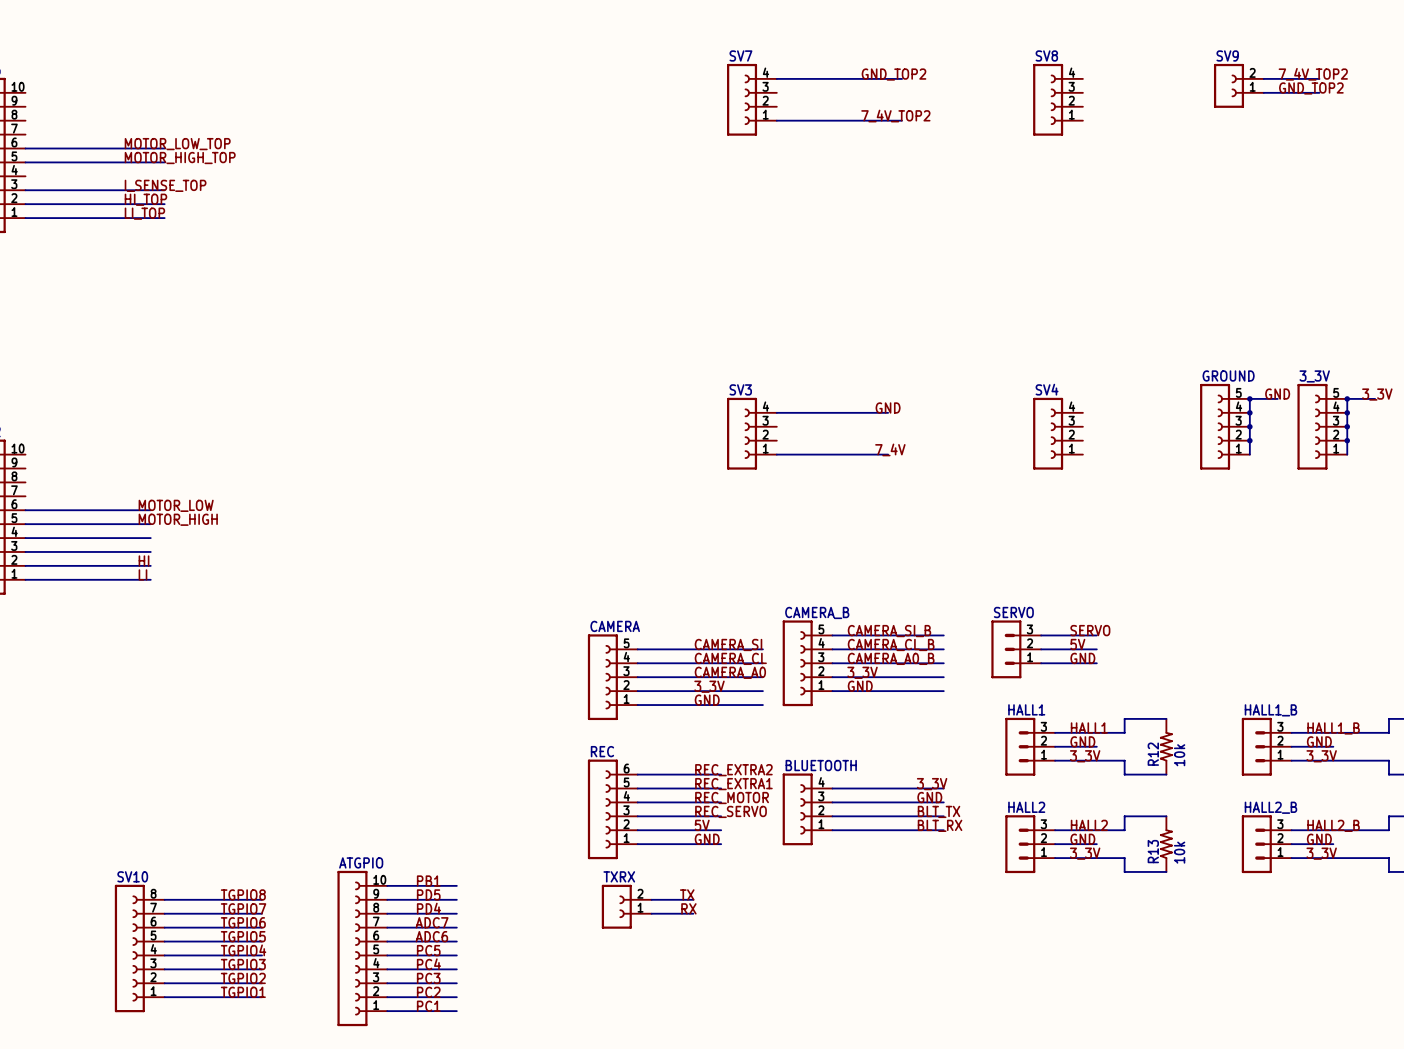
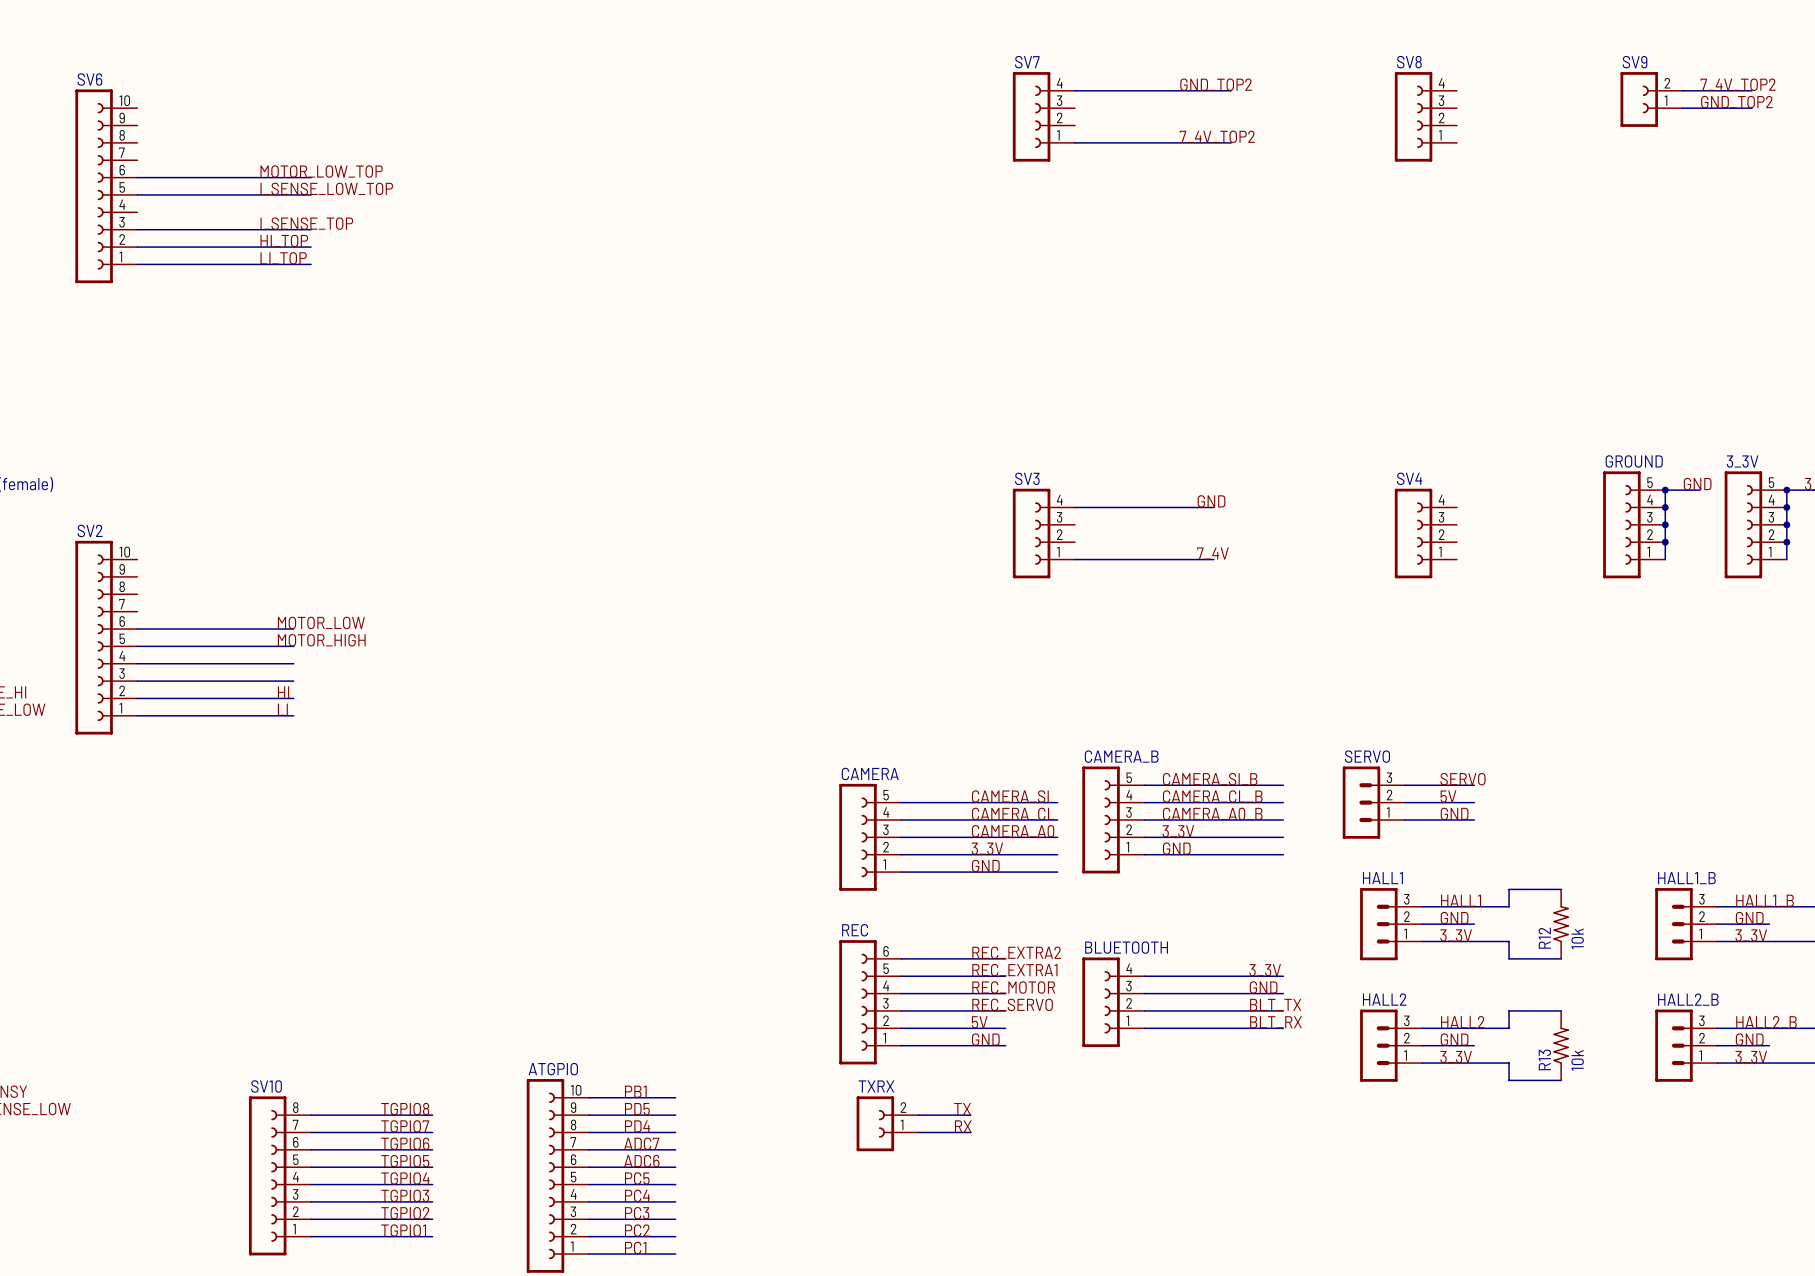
label: MOTOR_HIGH_TOP (180, 158) -> I_SENSE_LOW_TOP (326, 188)

